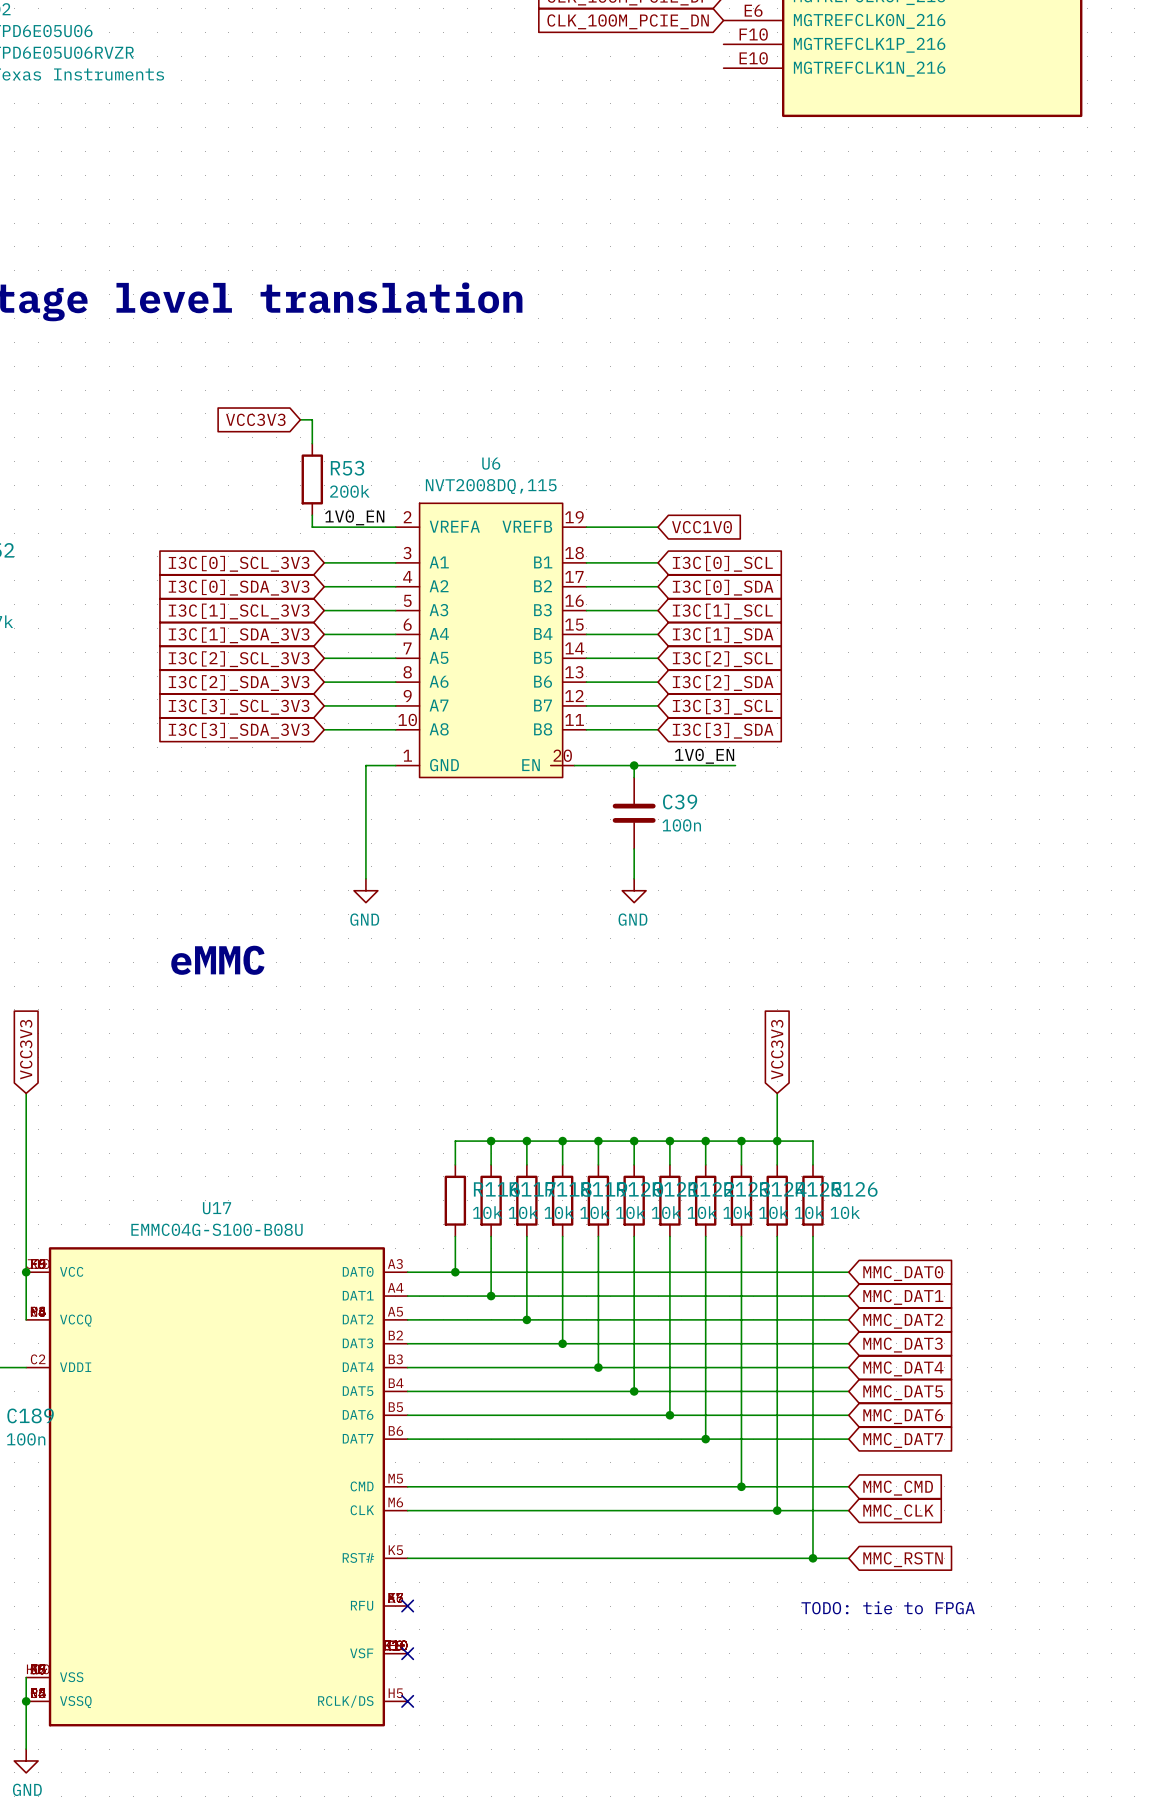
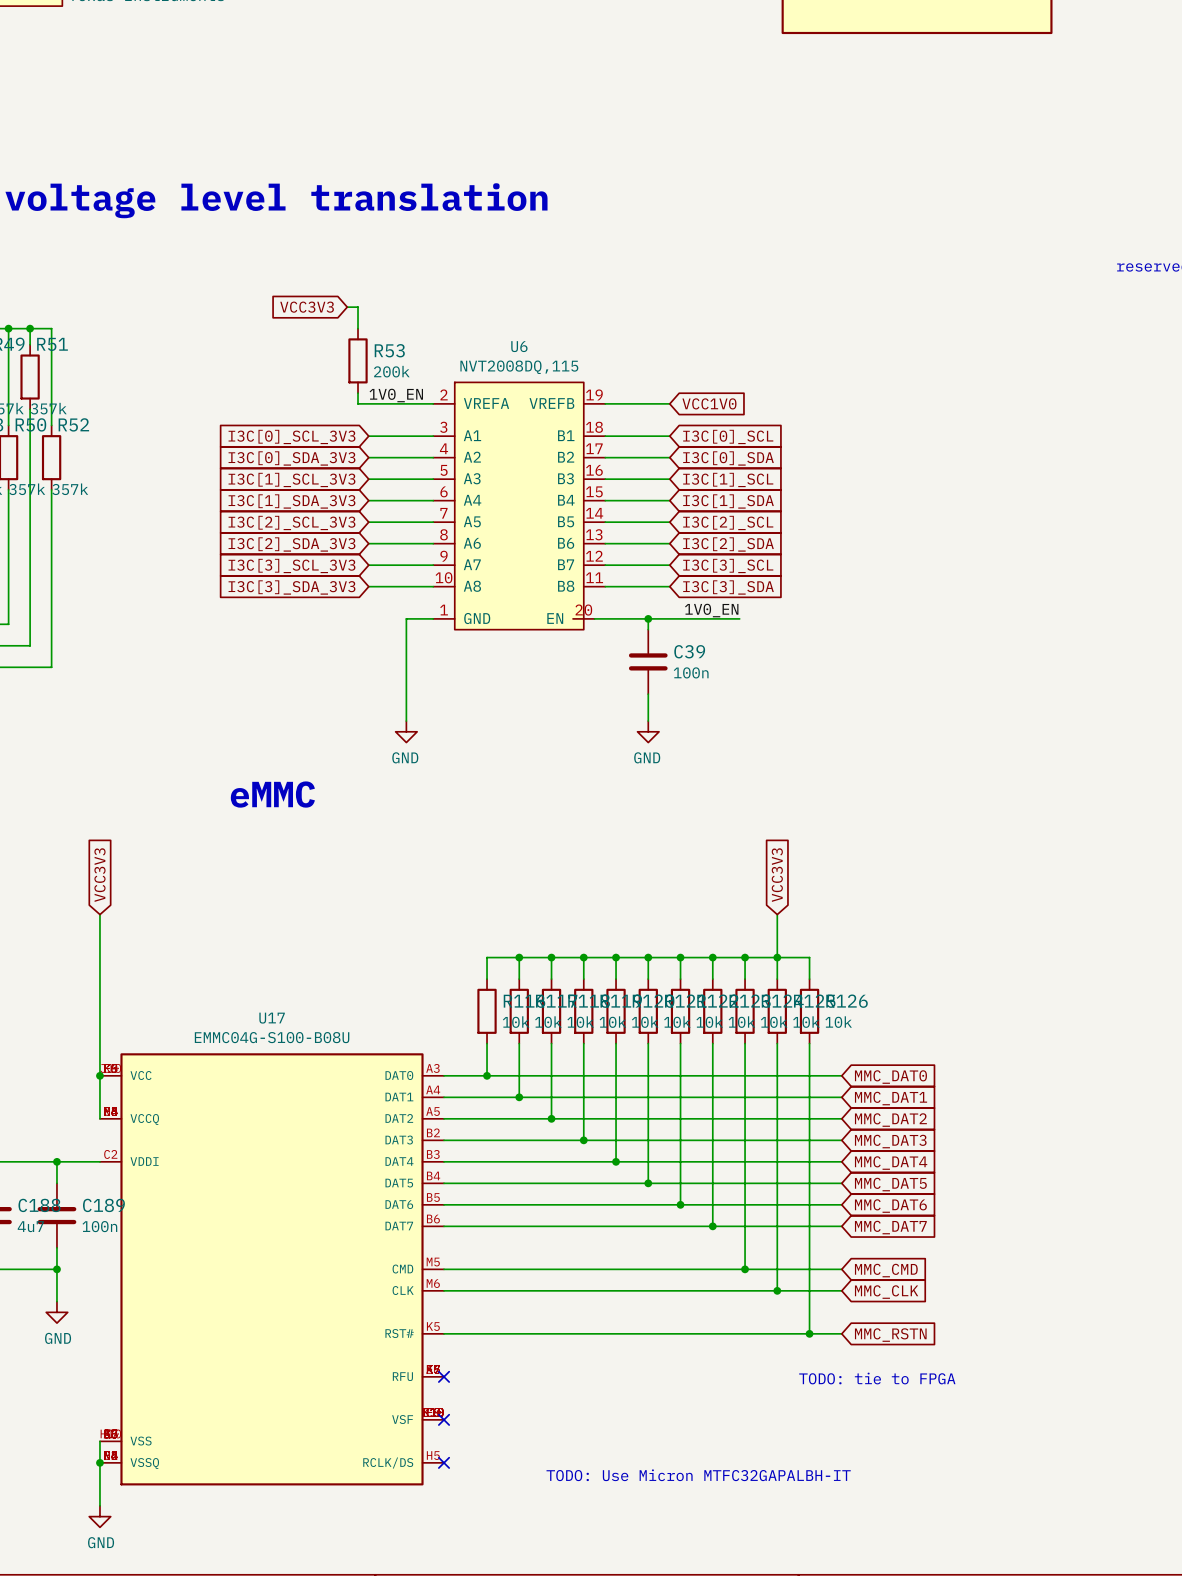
text: none -> TODO: Use Micron MTFC32GAPALBH-IT (698, 1475)

